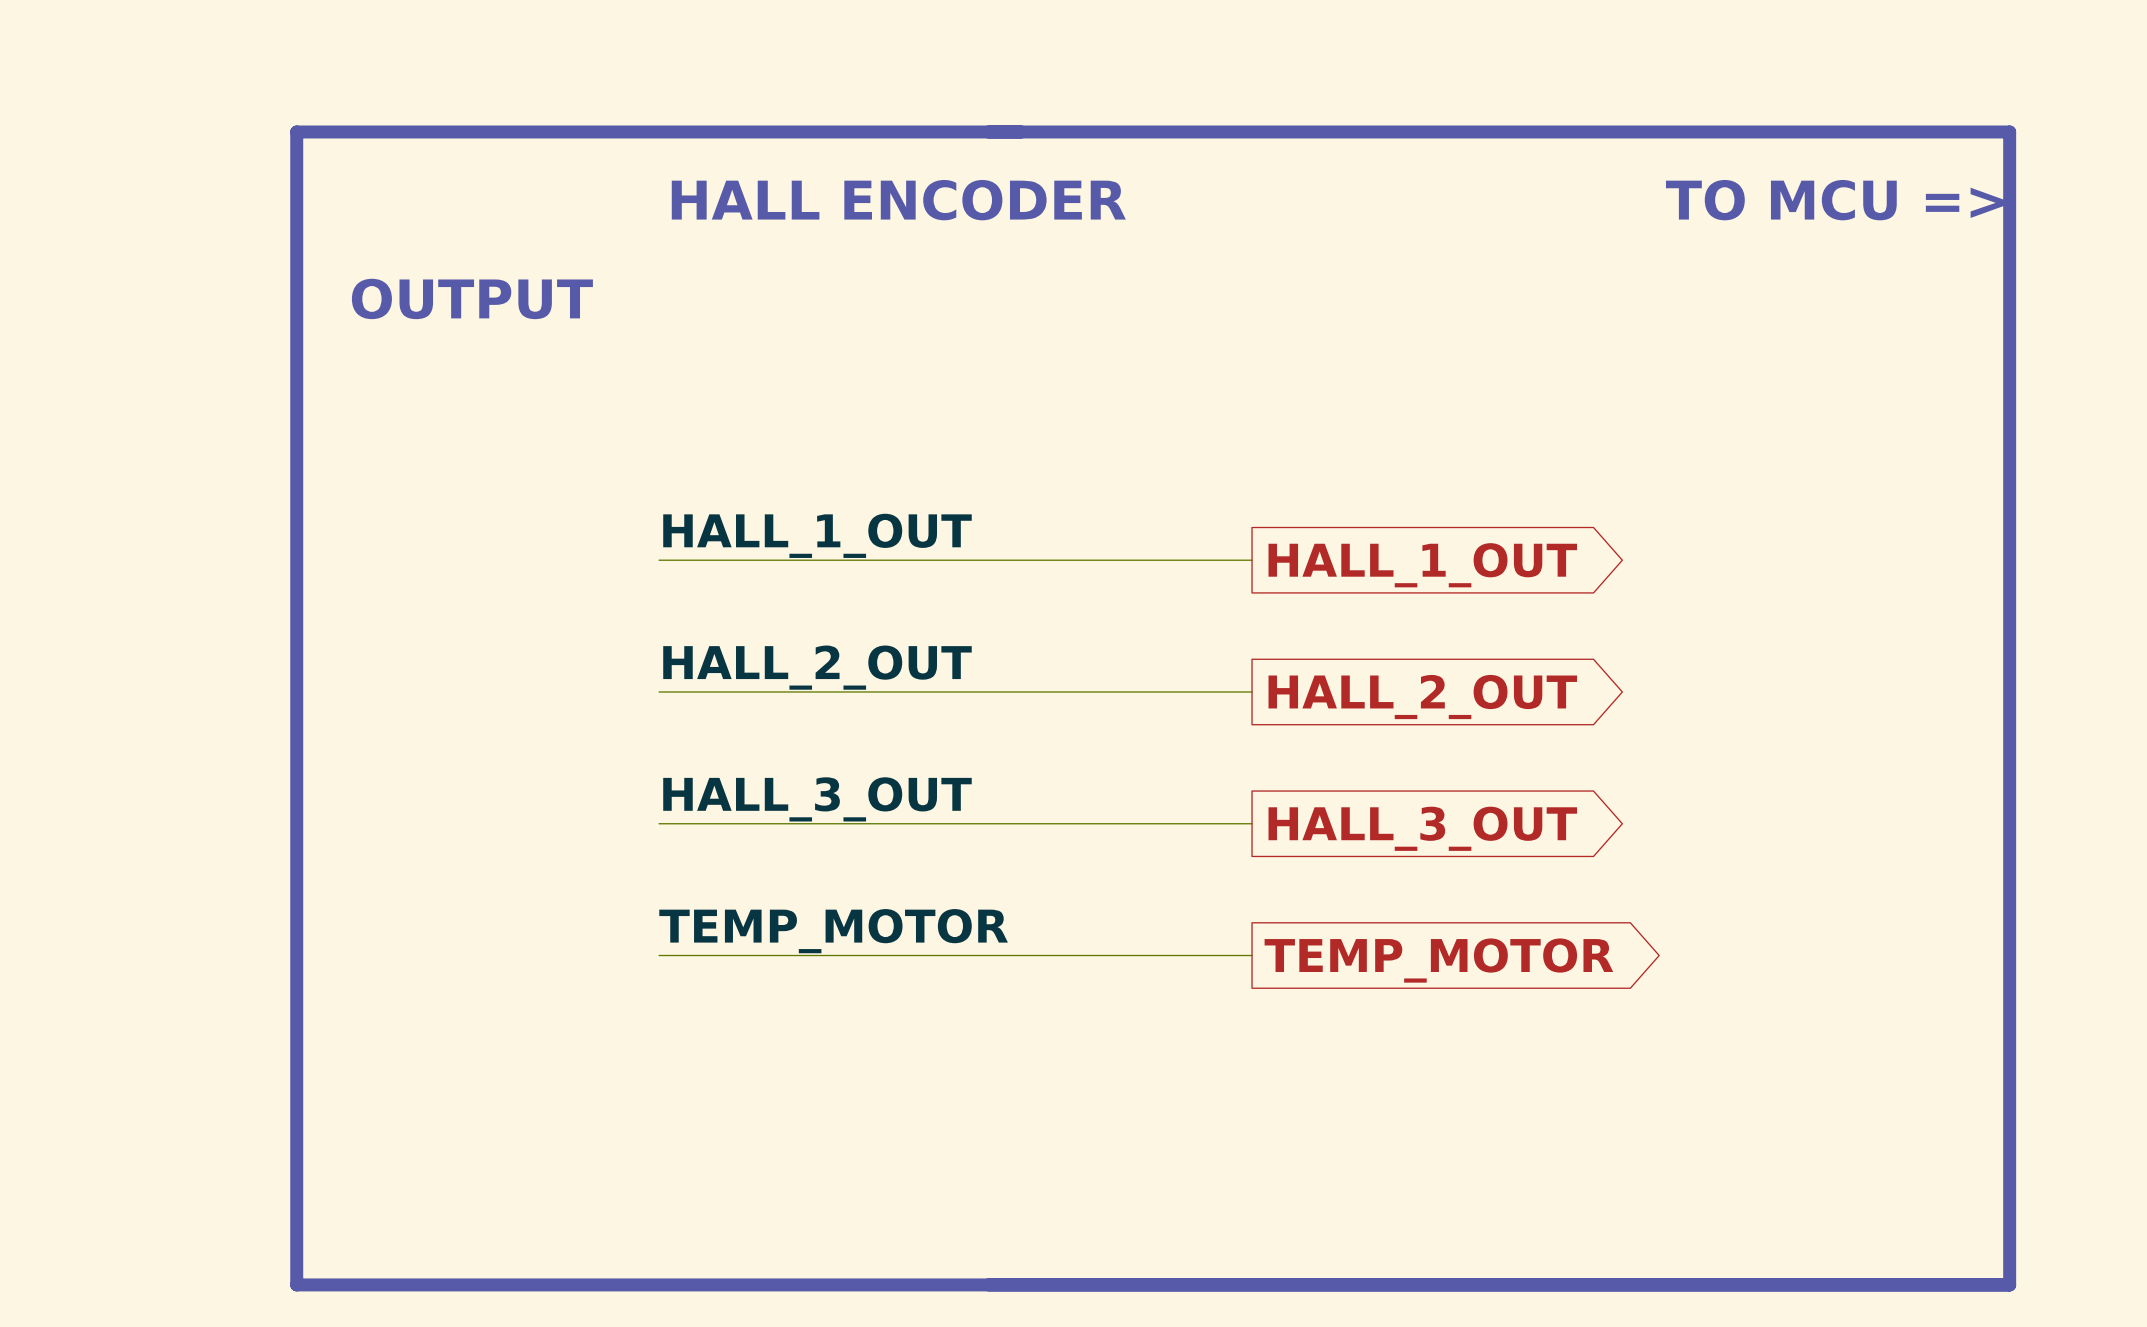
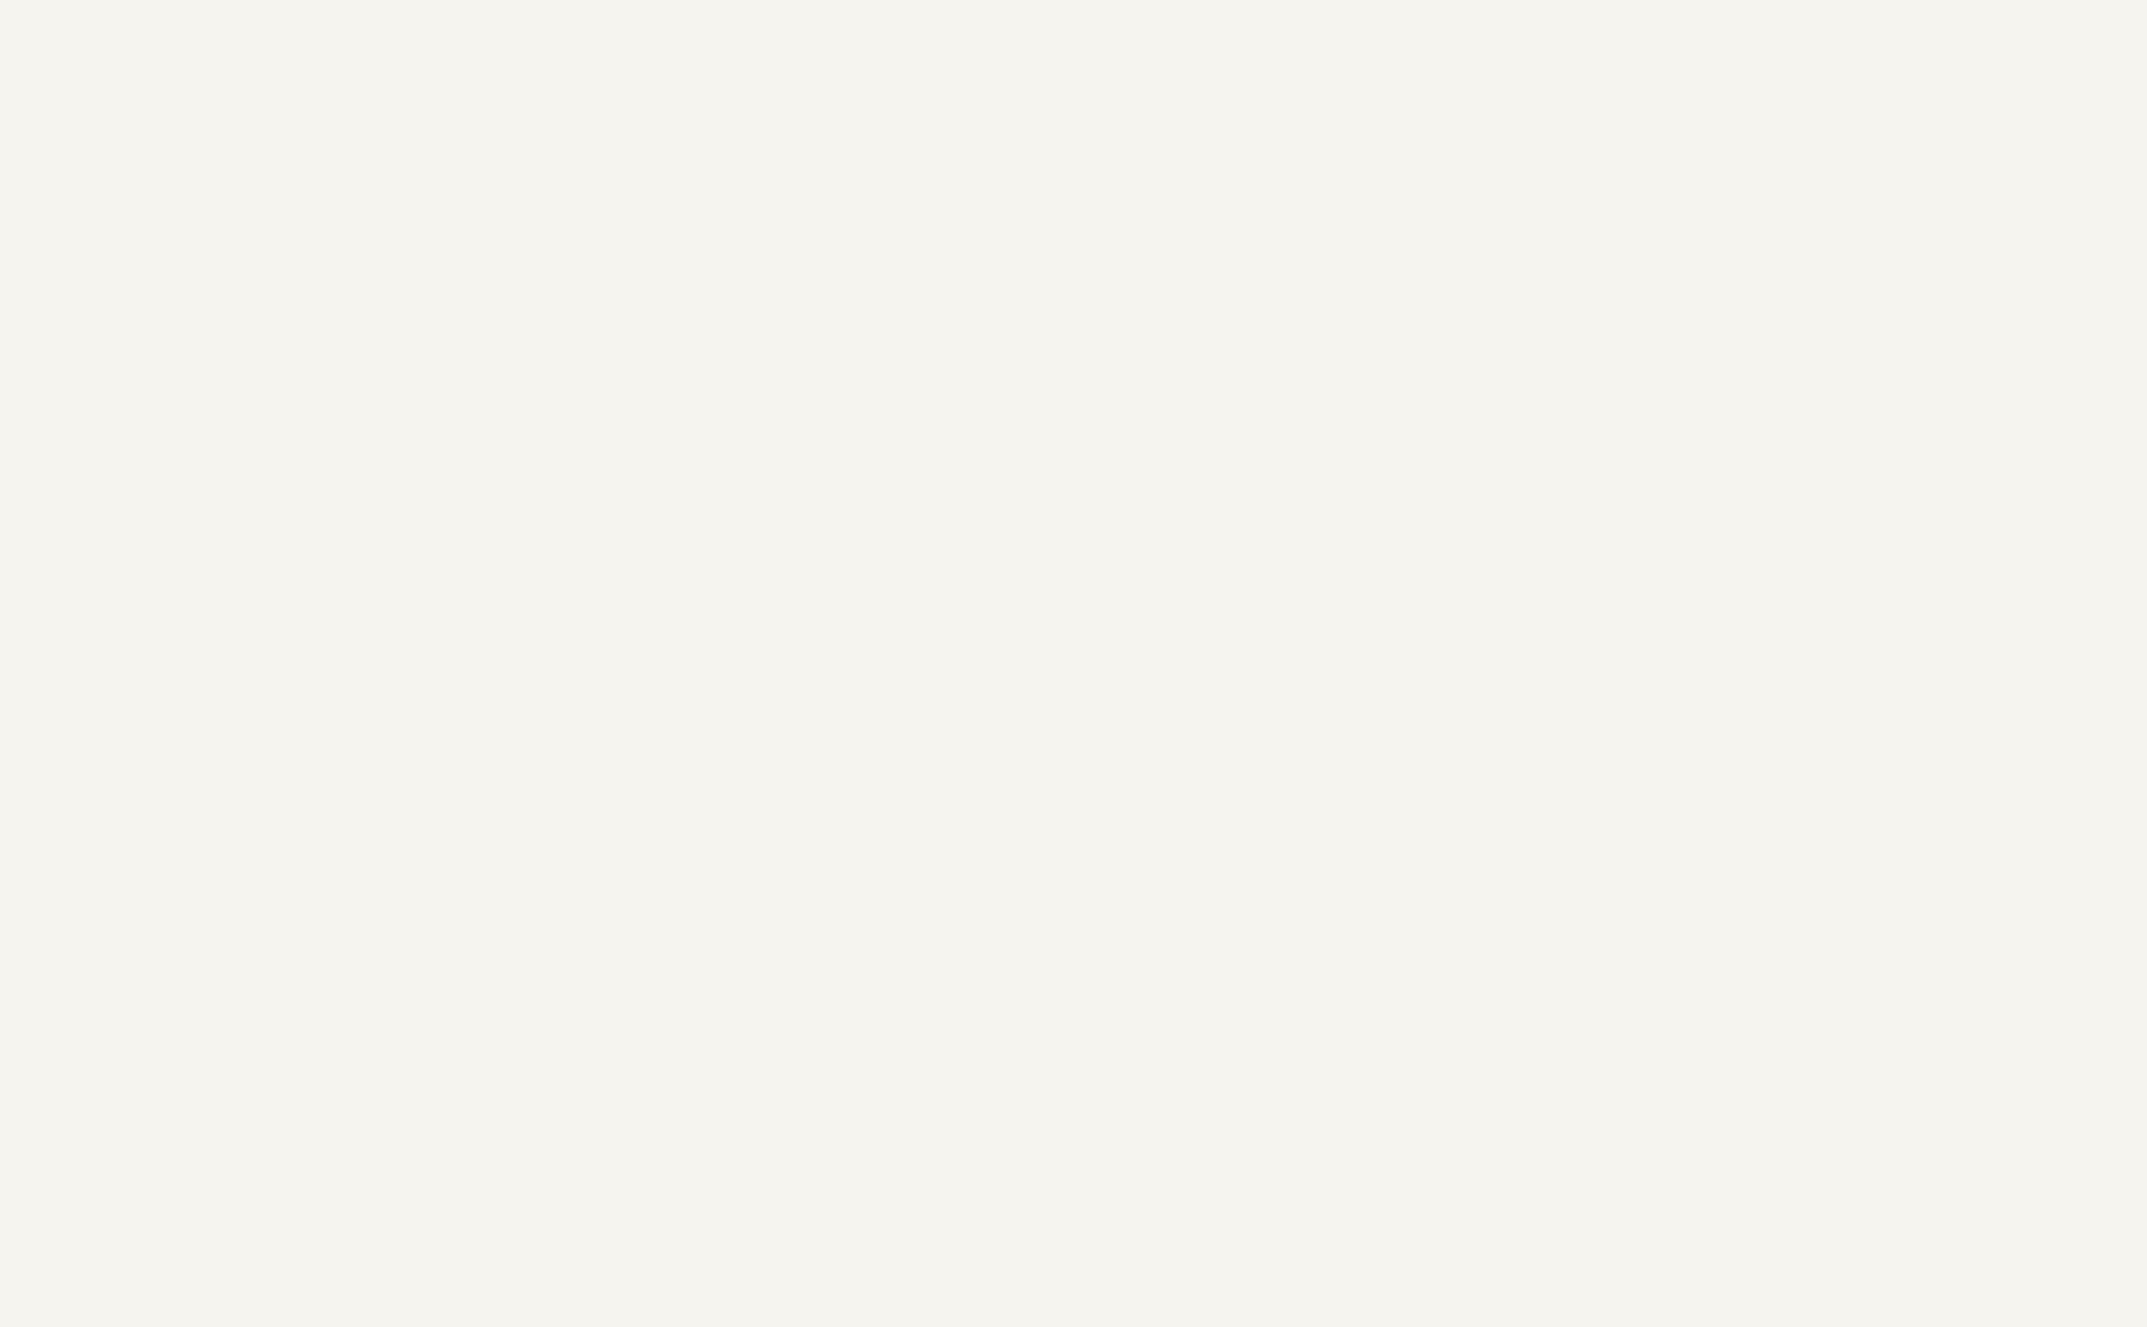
line: (296, 131) (296, 1284) (2009, 1284) (2009, 131) (296, 131) -> none
text: HALL ENCODER TO MCU => (1337, 200) -> none
text: OUTPUT (472, 298) -> none
label: HALL_1_OUT (817, 535) -> none
wire: (659, 560) (1252, 560) -> none
global label: HALL_1_OUT (1422, 565) -> none
label: HALL_2_OUT (817, 667) -> none
wire: (659, 691) (1252, 691) -> none
global label: HALL_2_OUT (1422, 697) -> none
label: HALL_3_OUT (817, 799) -> none
wire: (659, 823) (1252, 823) -> none
global label: HALL_3_OUT (1422, 828) -> none
label: TEMP_MOTOR (833, 931) -> none
wire: (659, 955) (1252, 955) -> none
global label: TEMP_MOTOR (1438, 960) -> none

